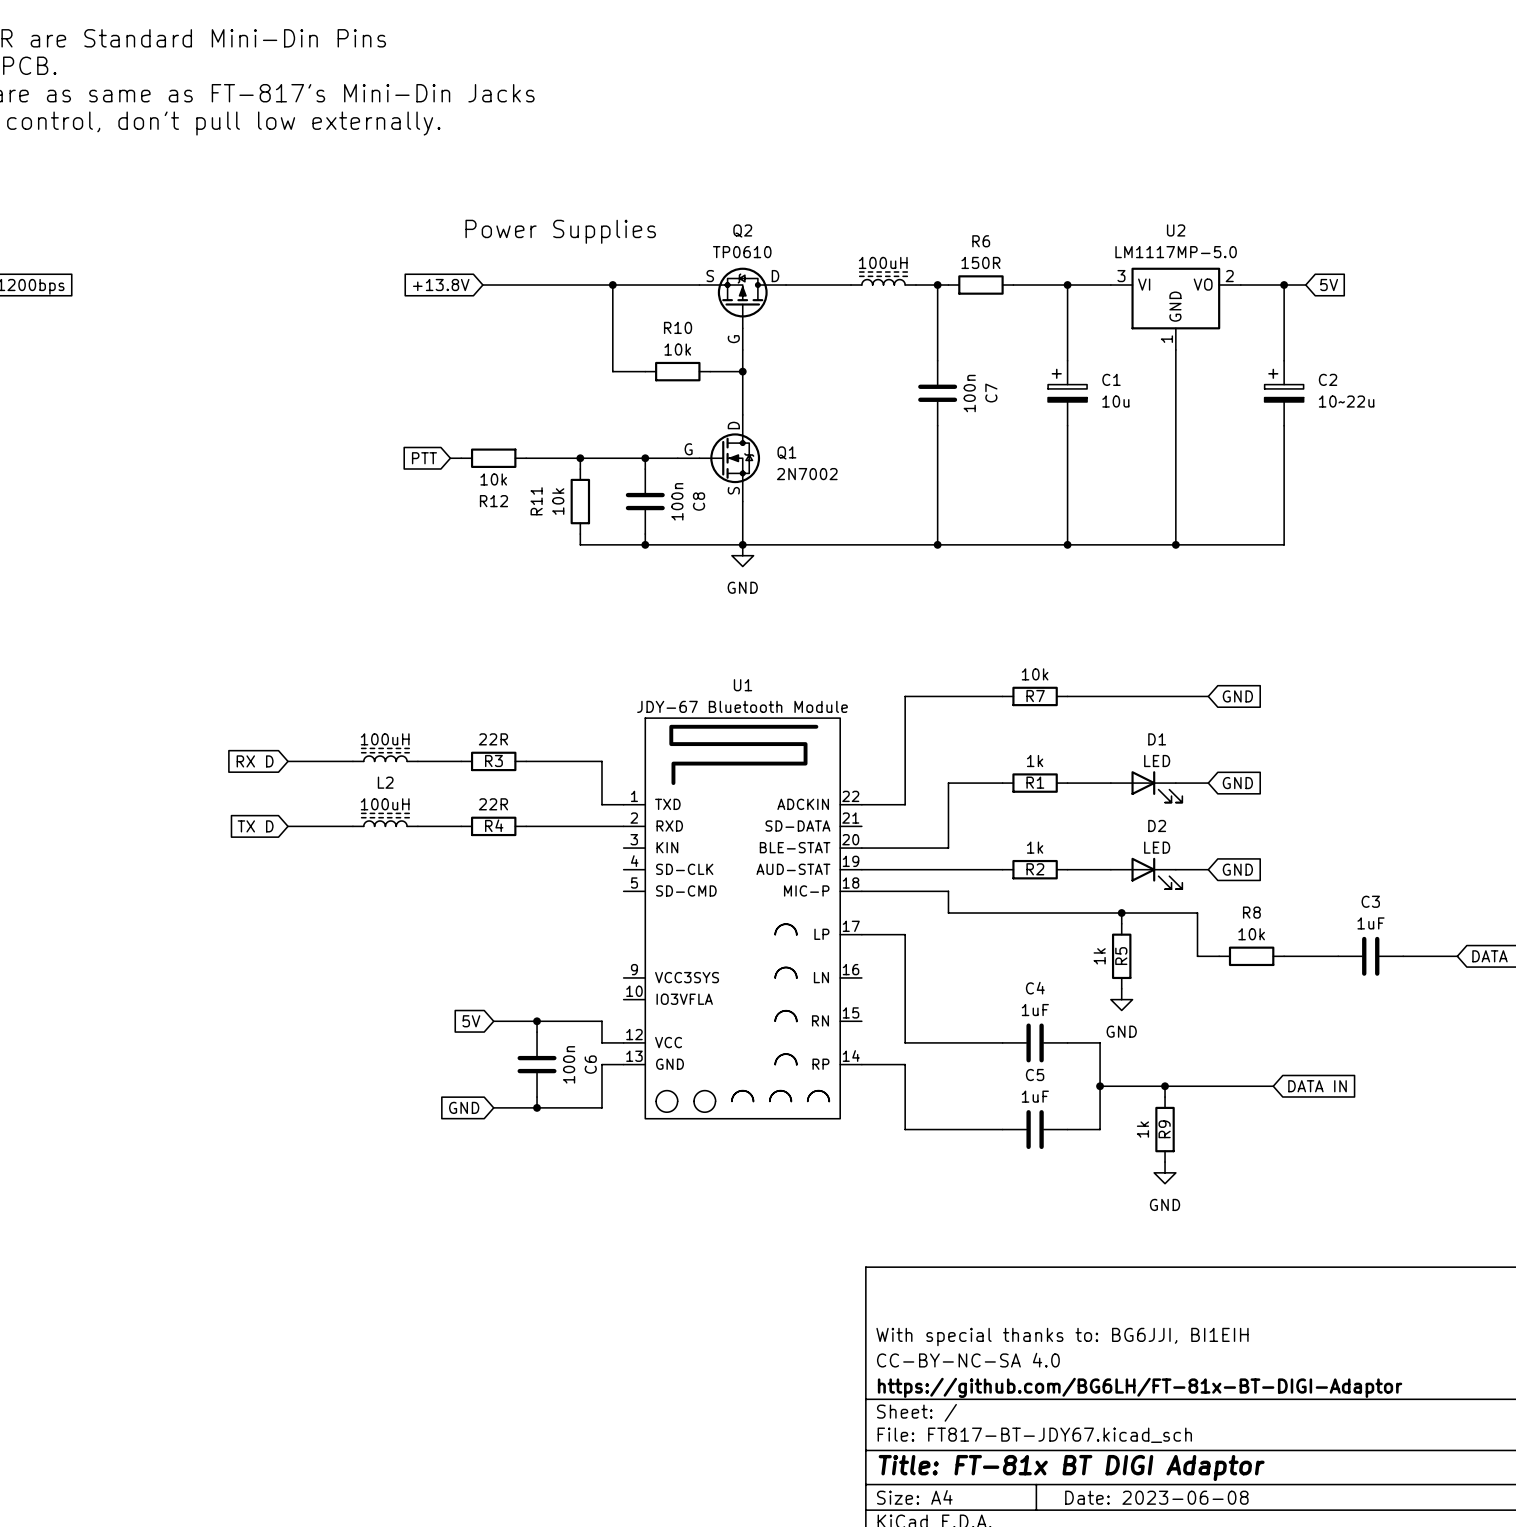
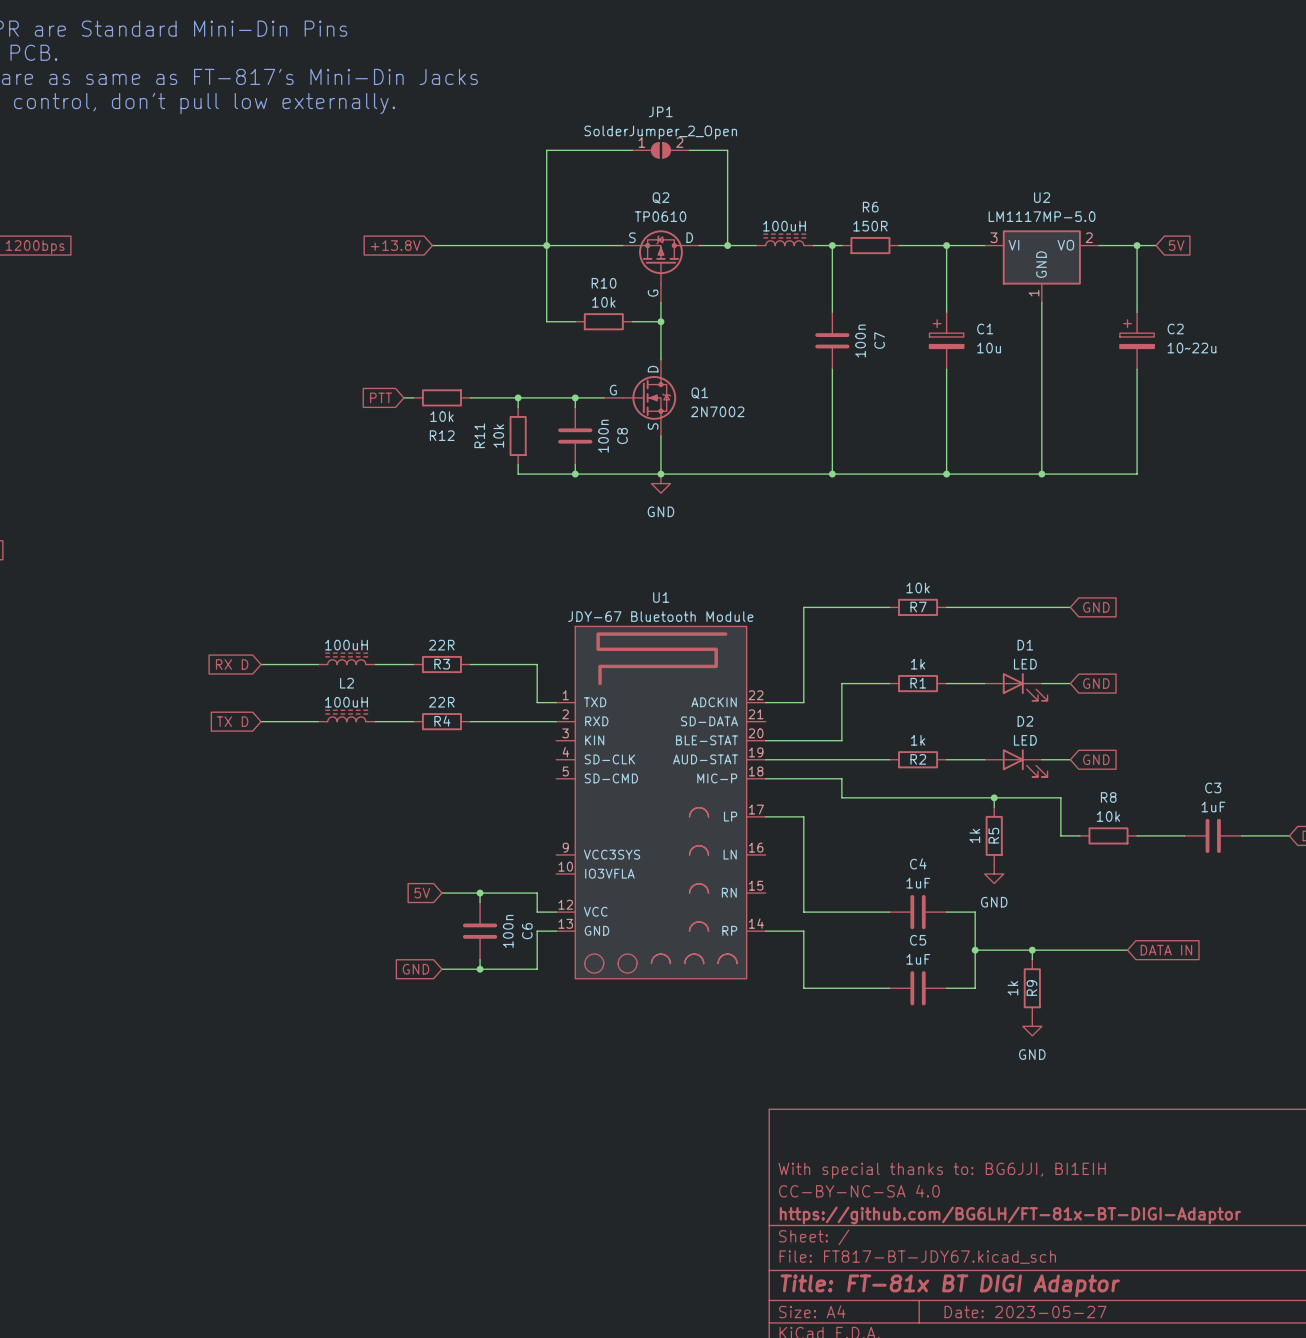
wire: none -> (632, 150) (546, 150) (546, 245)
JP1: none -> SolderJumper_2_Open (660, 150)
wire: none -> (689, 150) (727, 150) (727, 245)
text: Power Supplies (560, 231) -> none
junction: none -> (727, 245)
title block: Date: 2023-06-08 (1156, 1497) -> Date: 2023-05-27 (1025, 1312)

